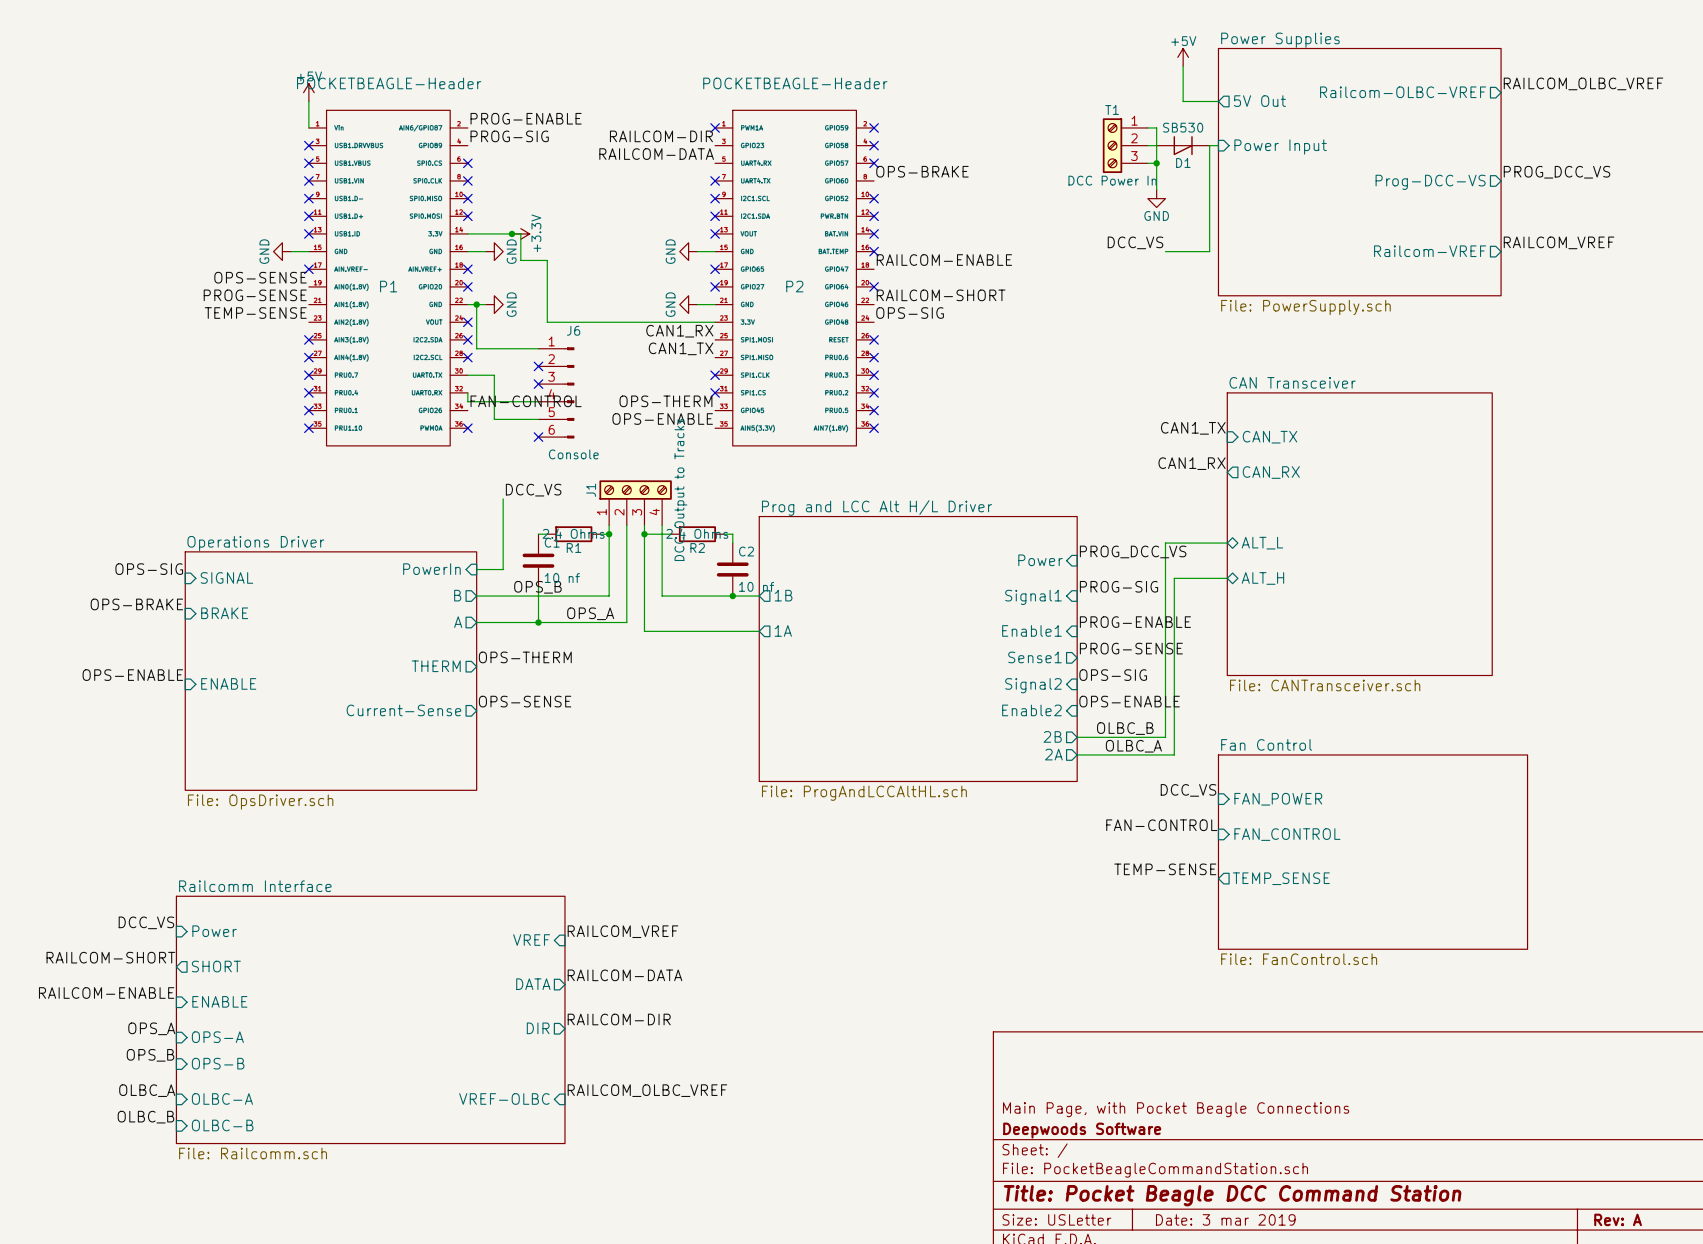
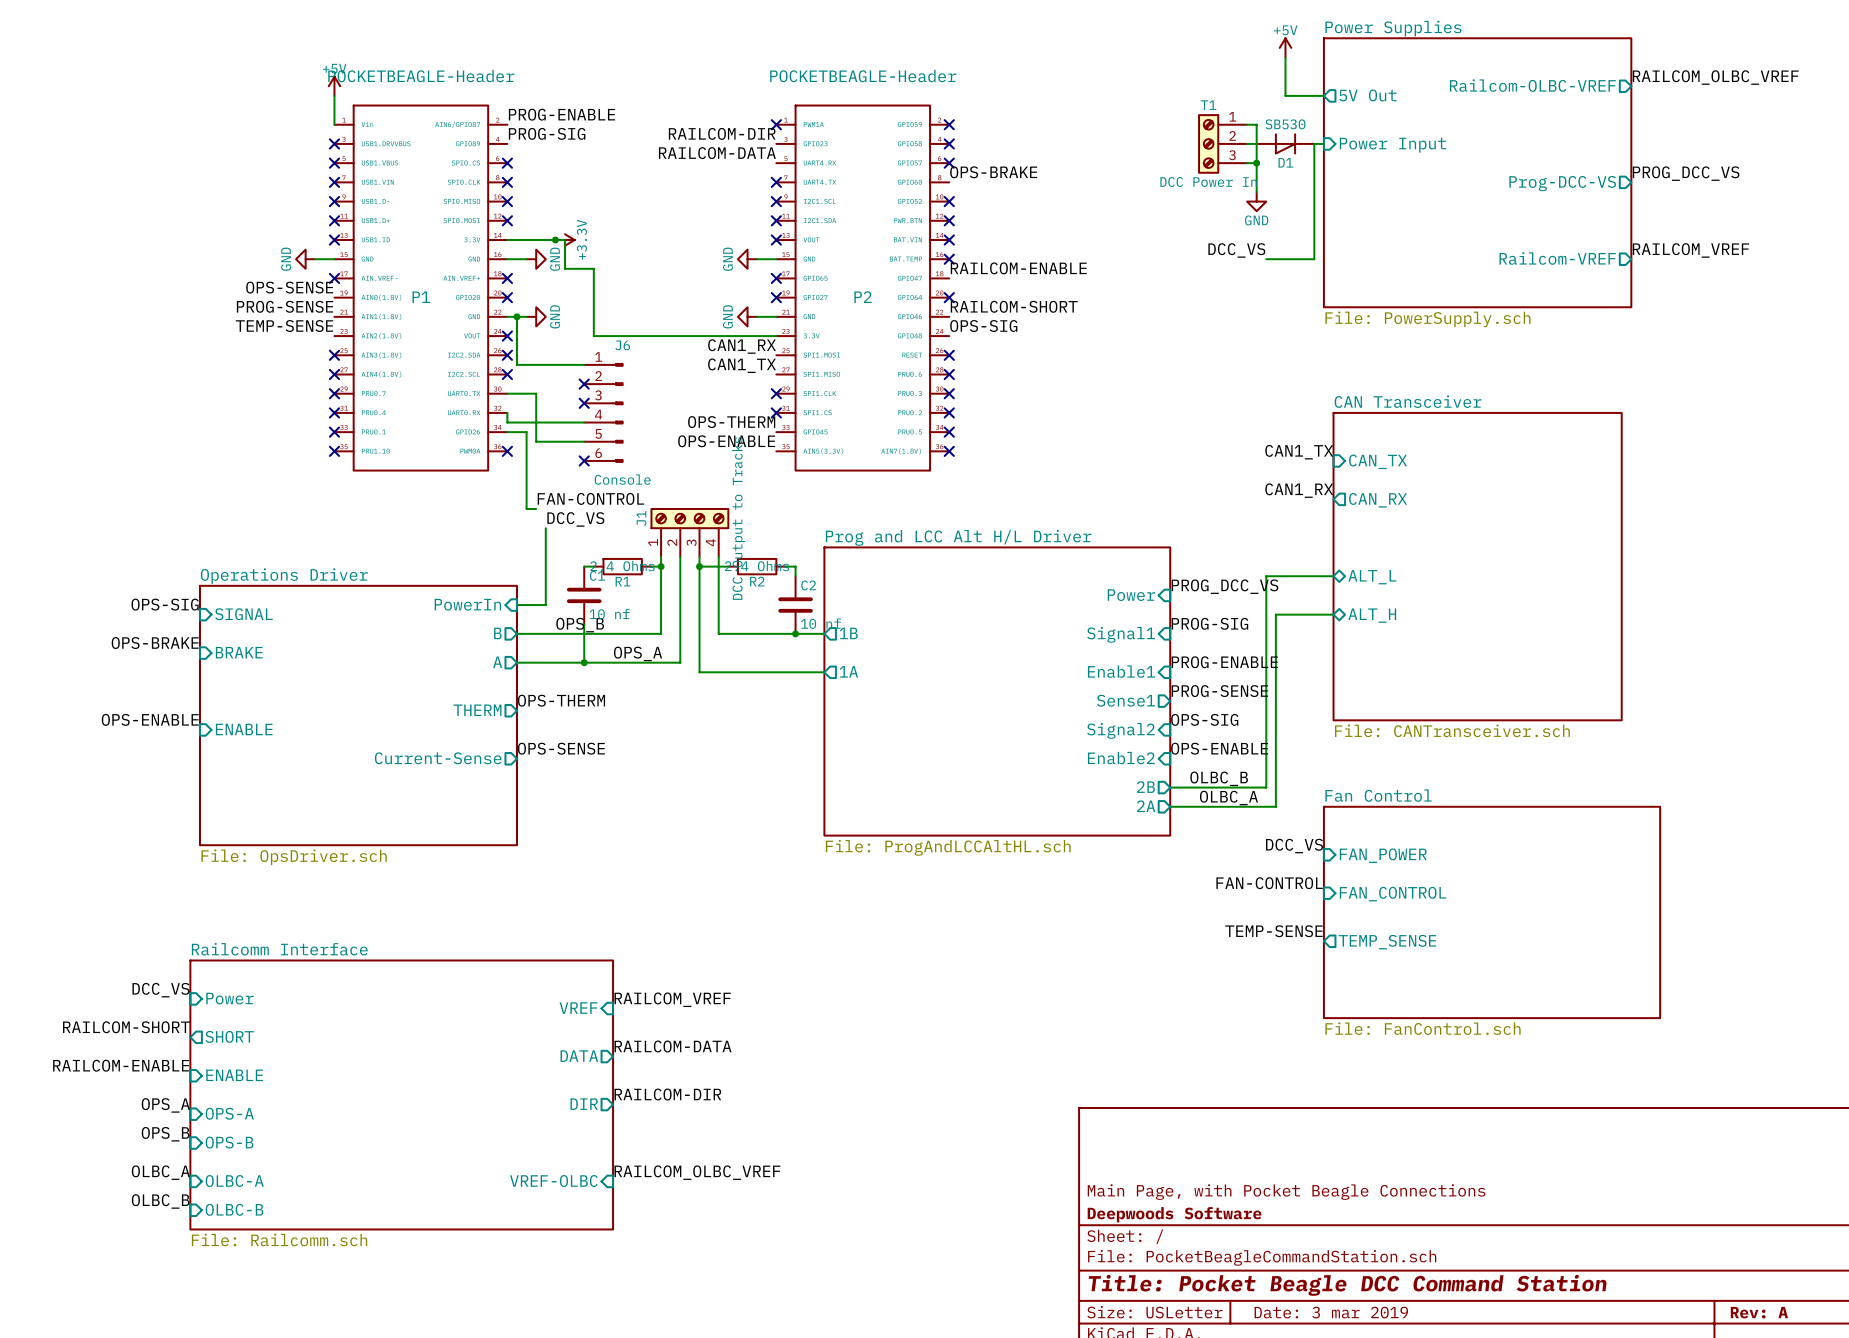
label position: FAN-CONTROL (526, 401) -> FAN-CONTROL (590, 498)
wire: none -> (507, 432) (526, 432) (526, 508) (536, 508)

